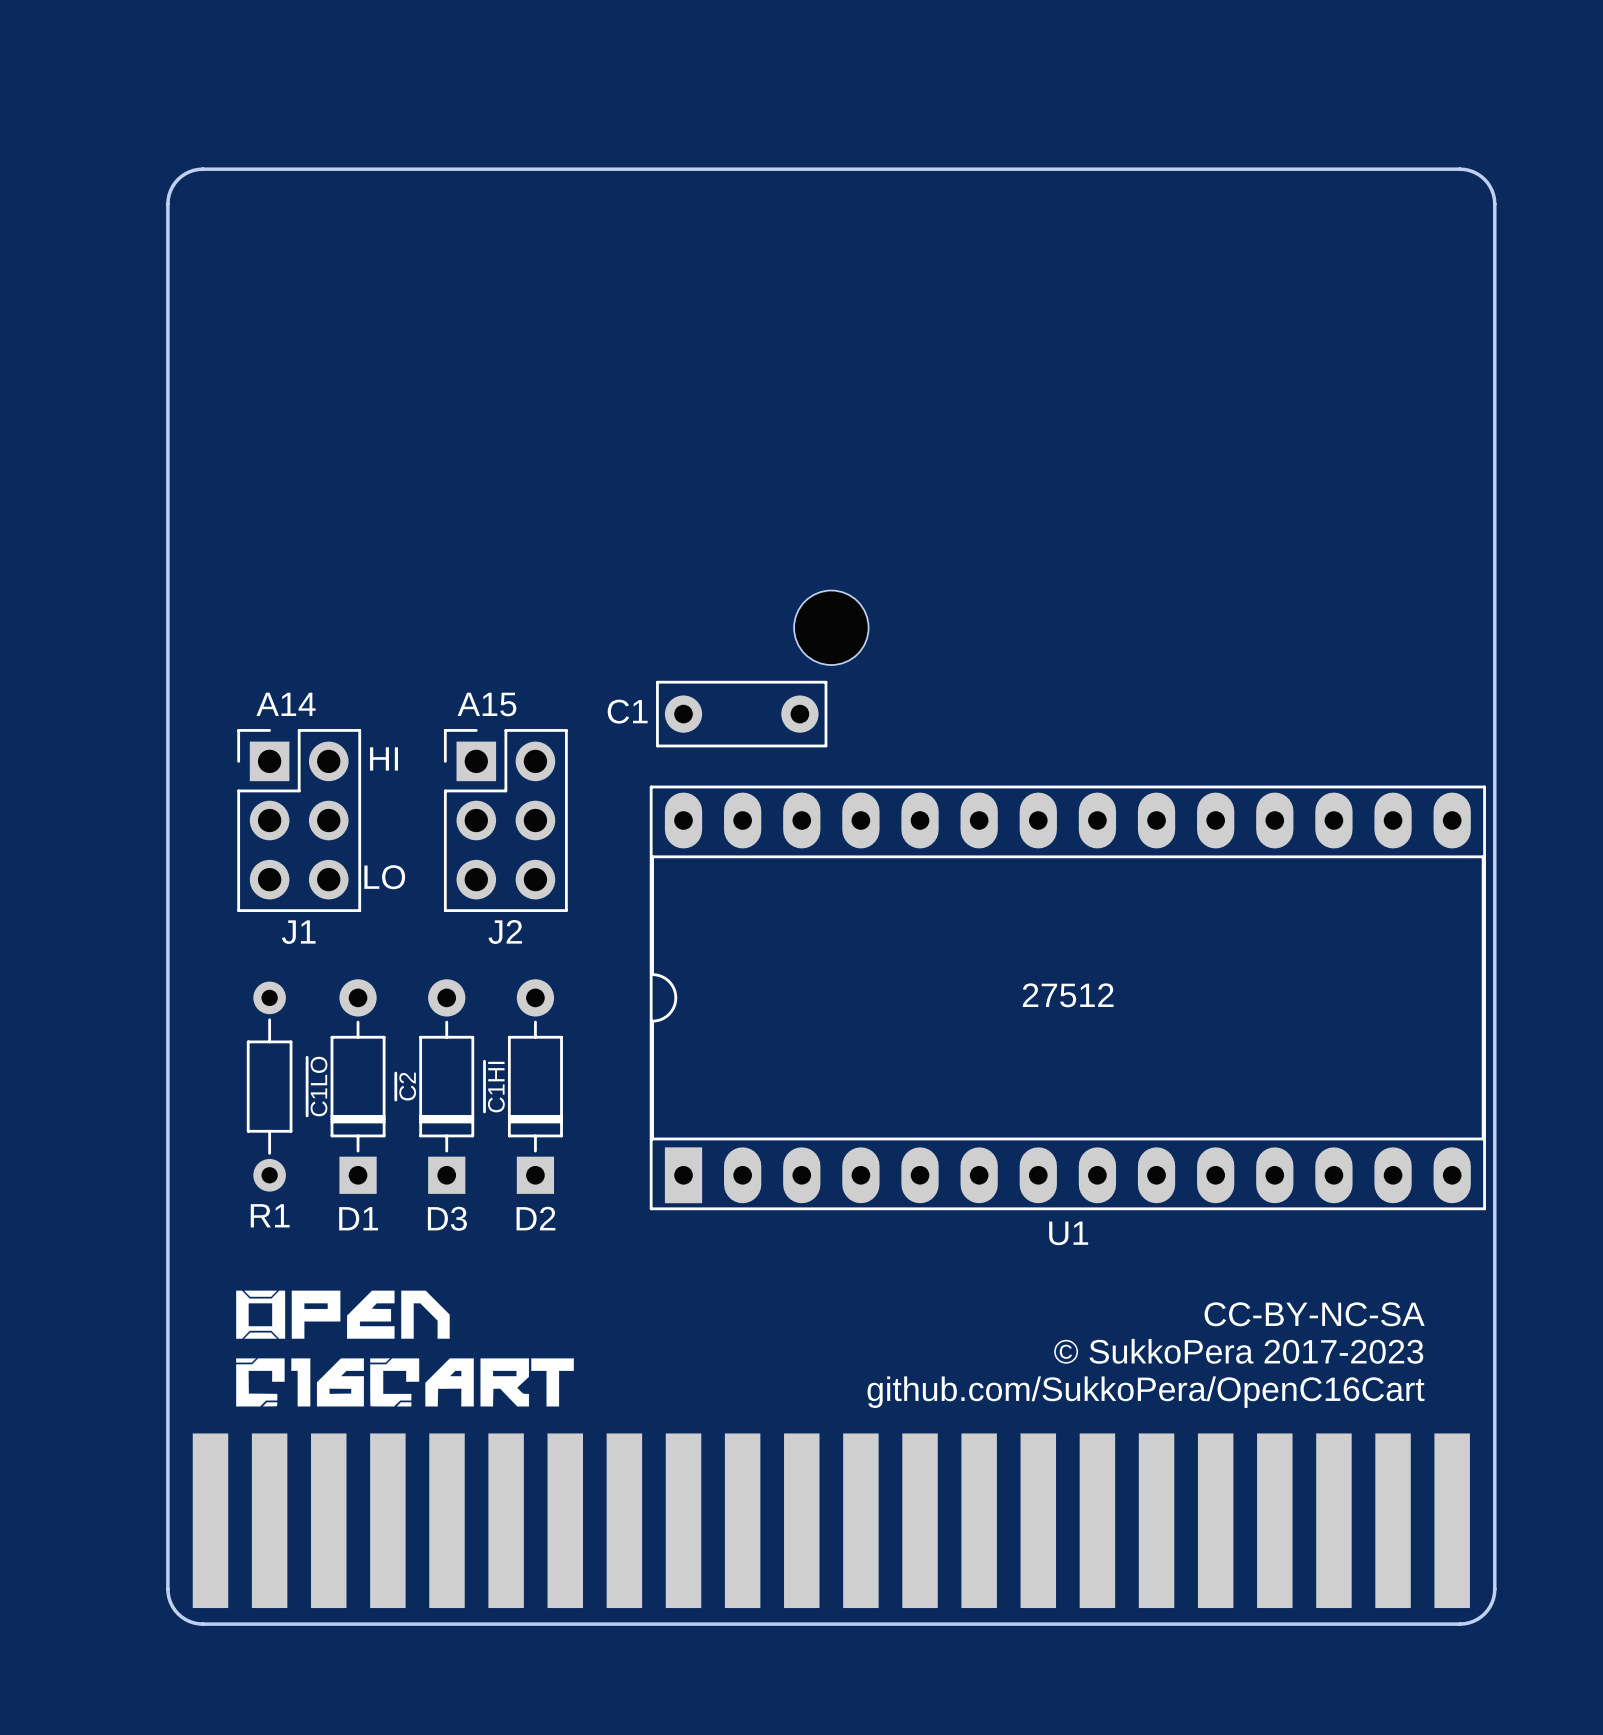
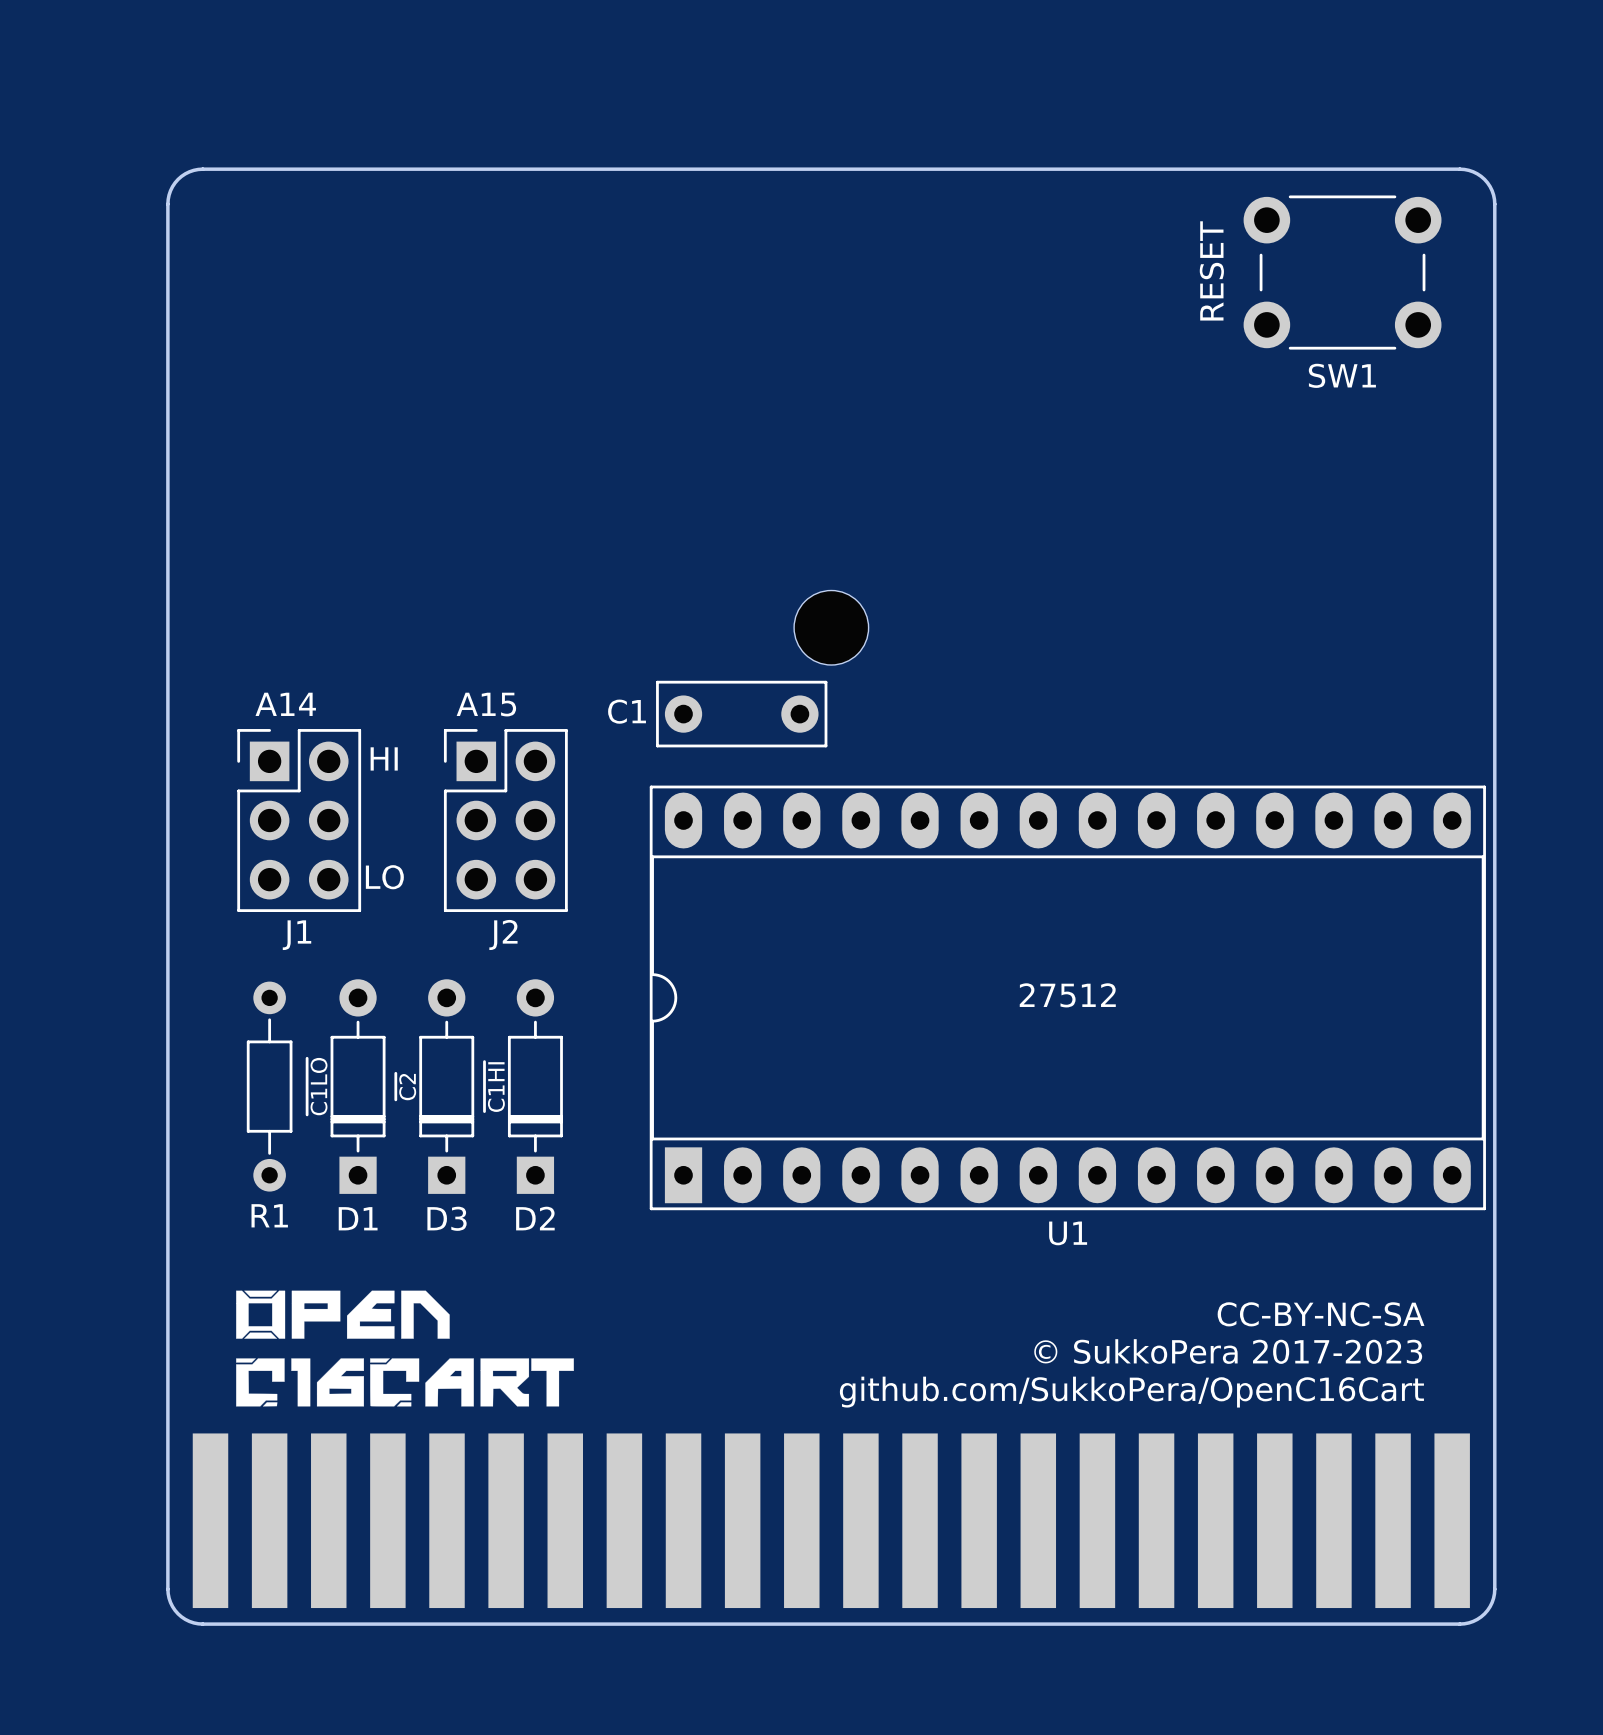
text: none -> RESET (1211, 270)
SW1: none -> (1342, 272)

